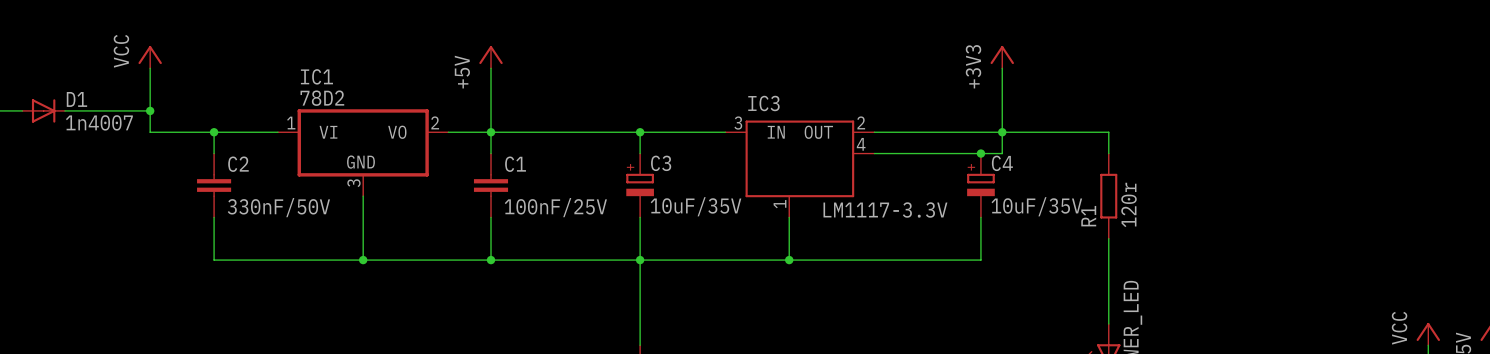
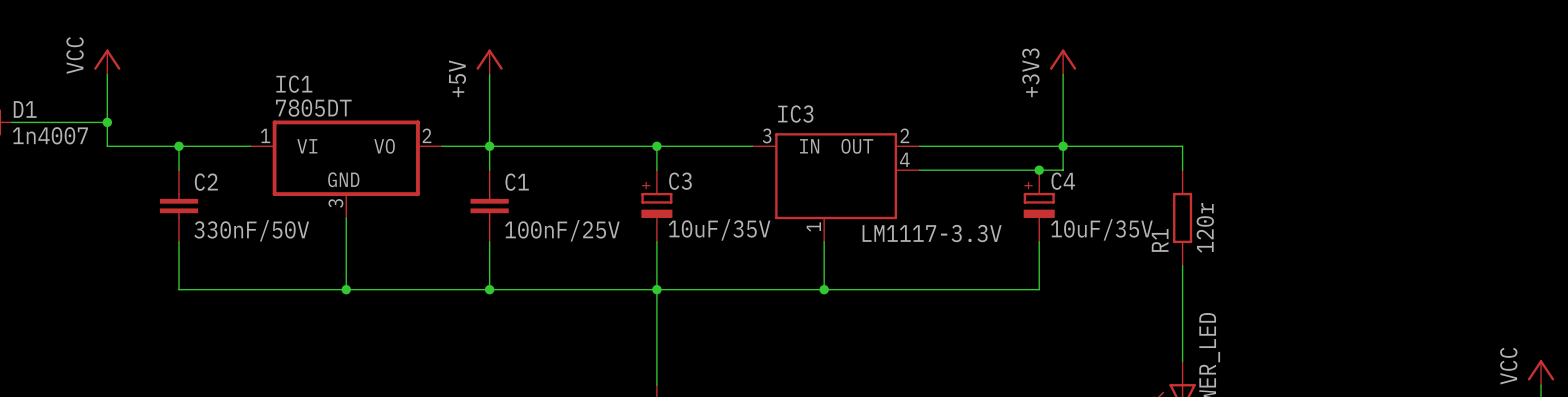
IC1 value: 78D2 (322, 98) -> 7805DT (313, 108)

